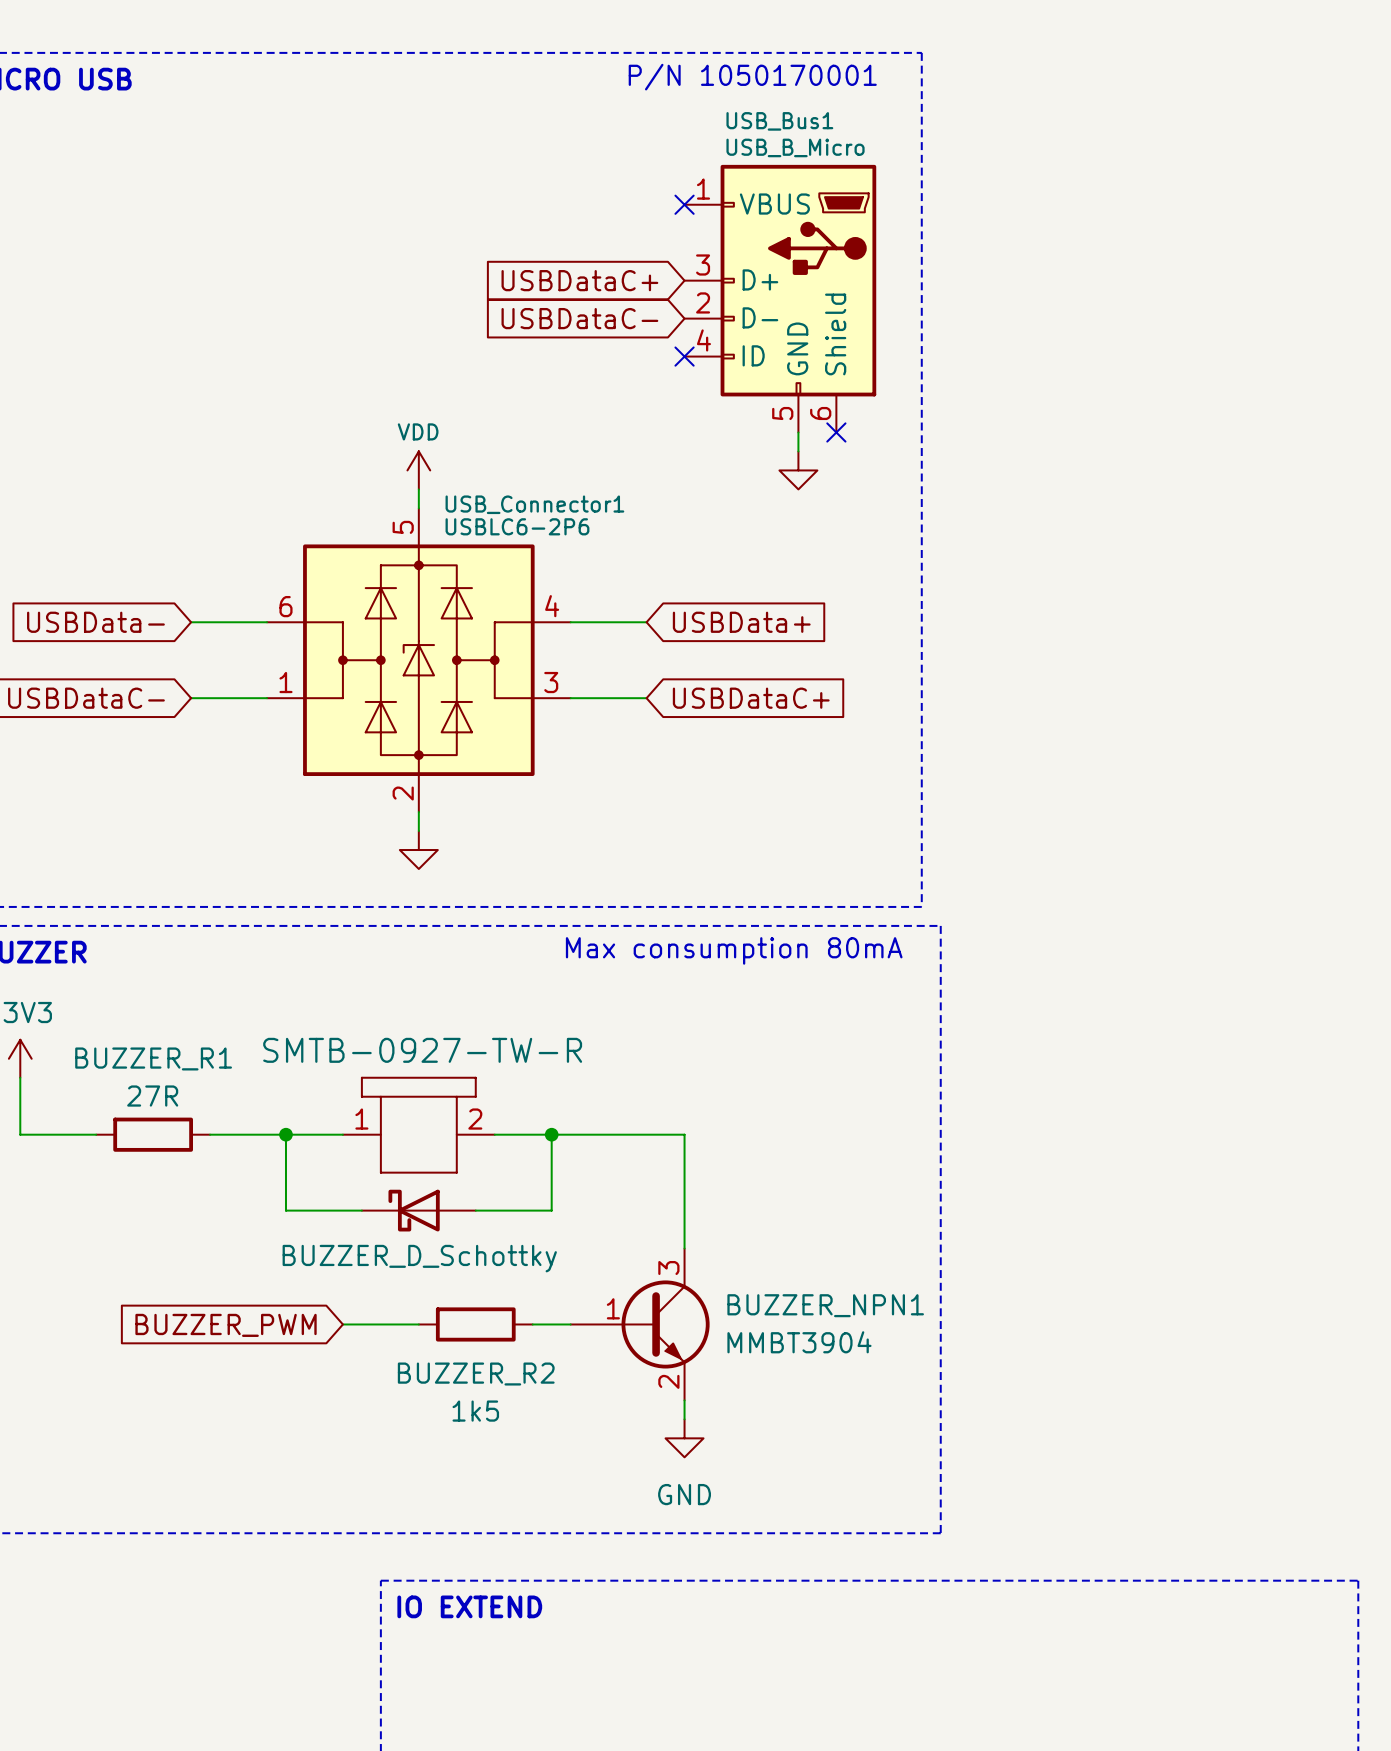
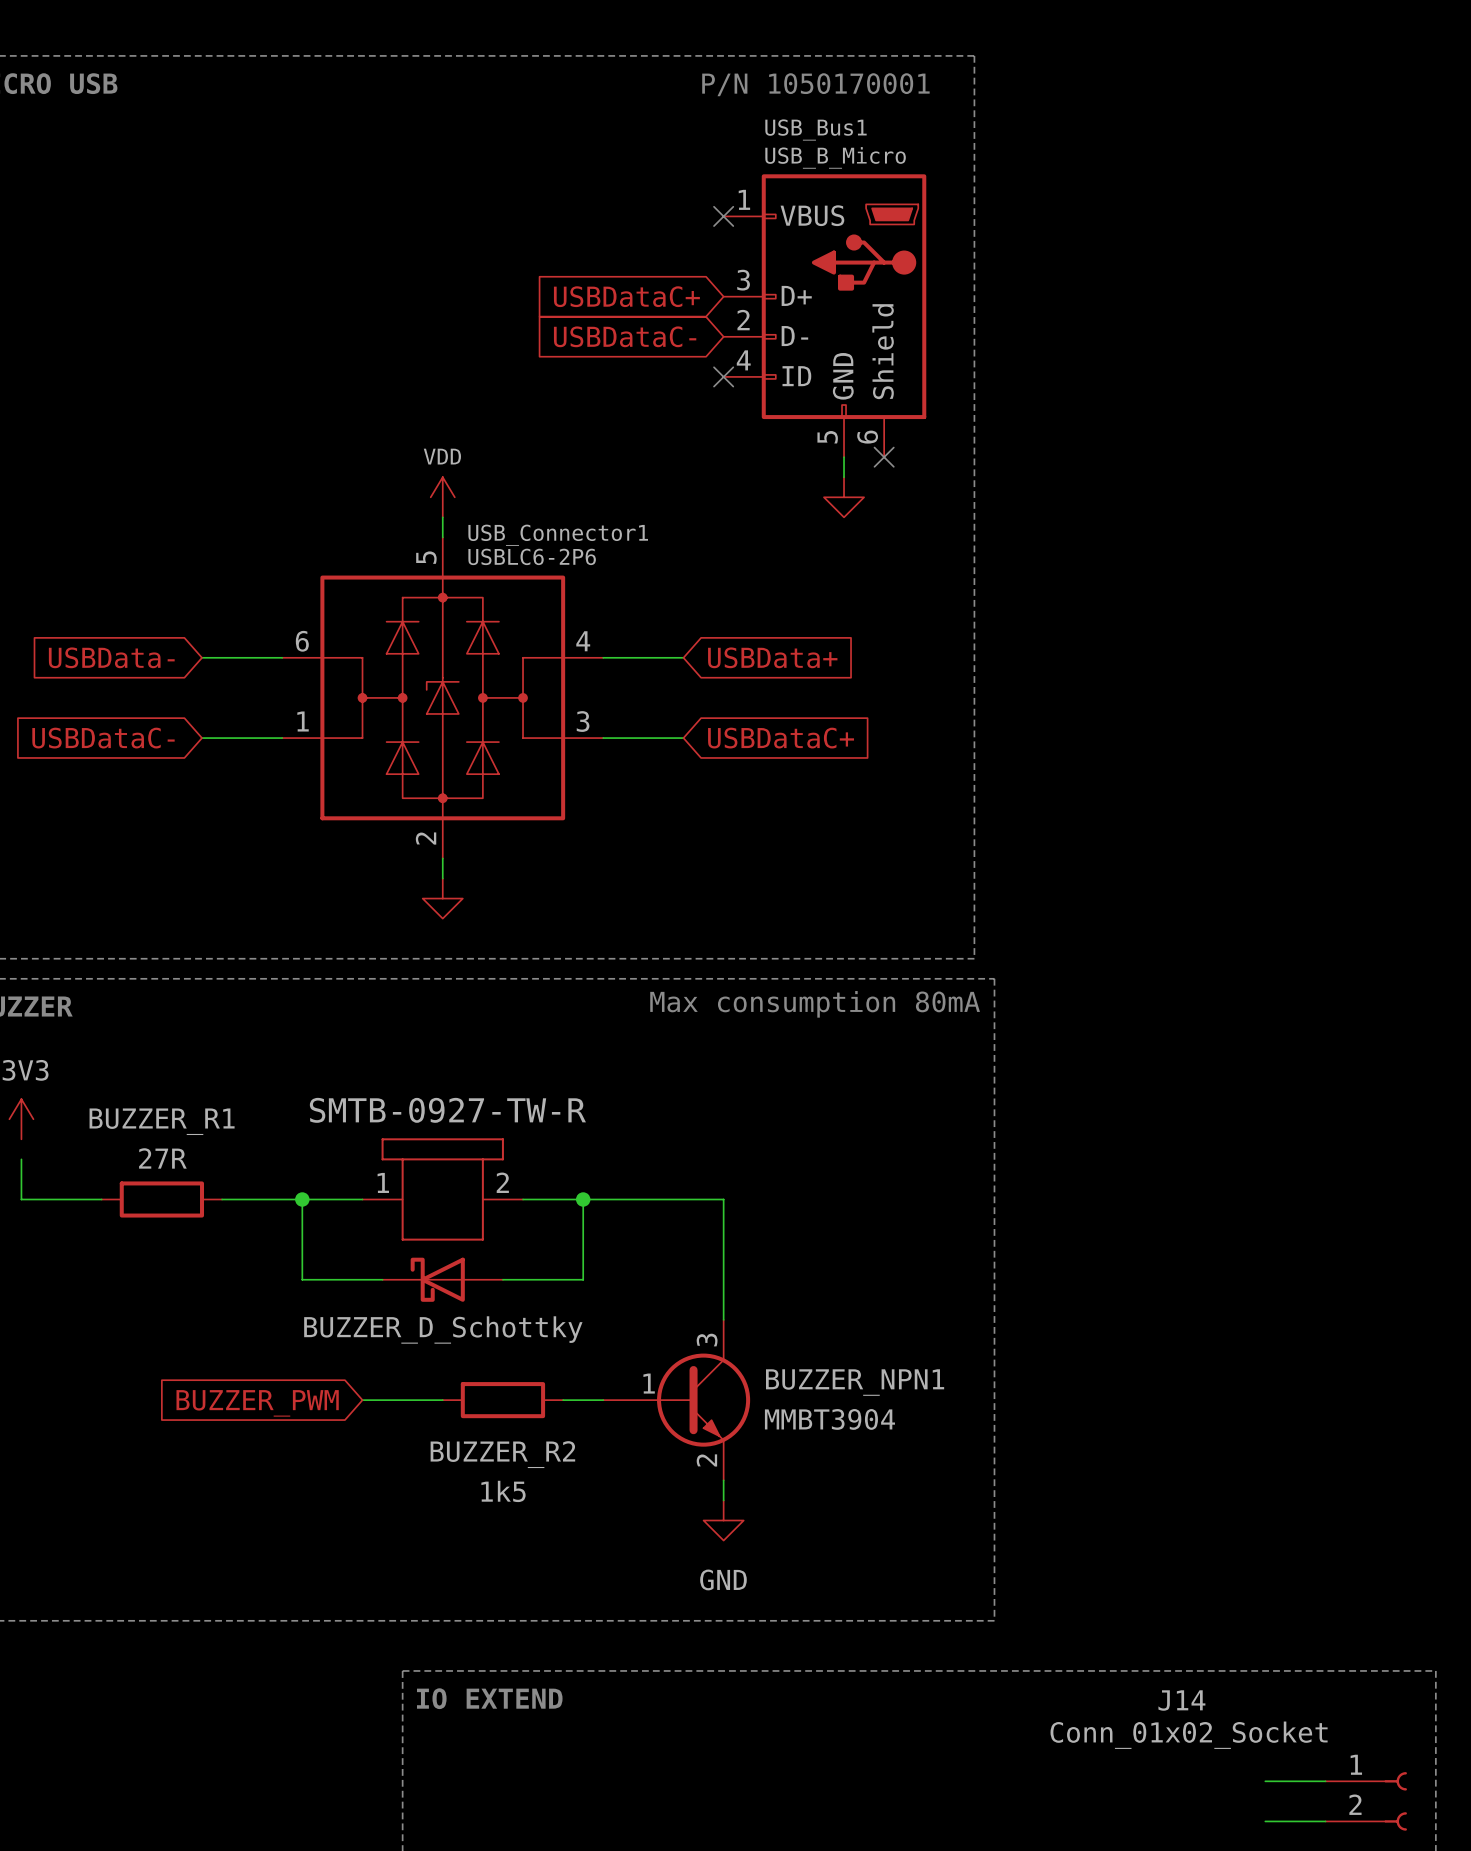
text position: P/N 1050170001 (752, 77) -> P/N 1050170001 (815, 84)
text position: Max consumption 80mA (734, 950) -> Max consumption 80mA (815, 1004)
wire: (20, 1077) (20, 1096) -> none
wire: none -> (1265, 1781) (1325, 1781)
J14: none -> Conn_01x02_Socket (1366, 1801)
wire: none -> (1265, 1821) (1325, 1821)

